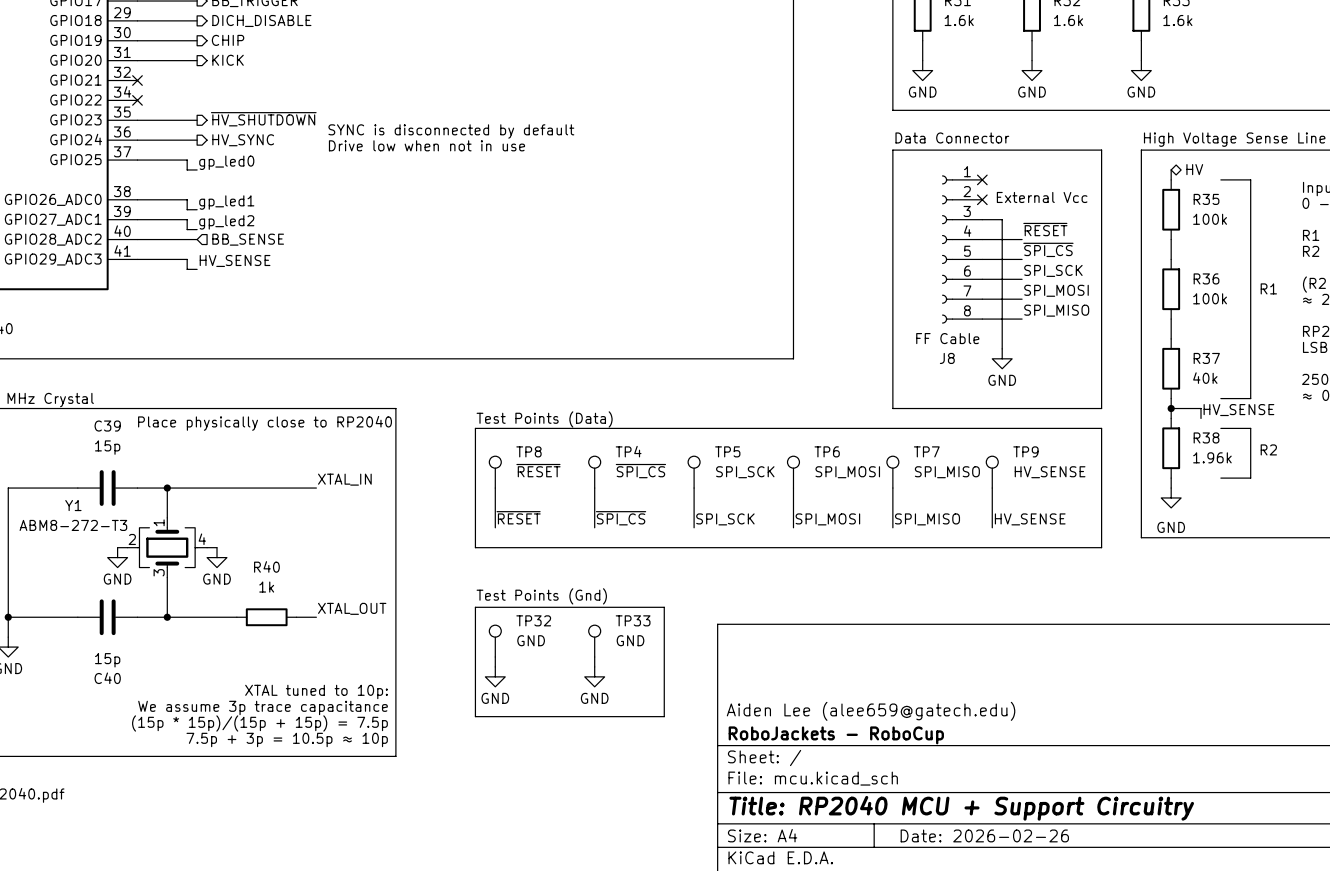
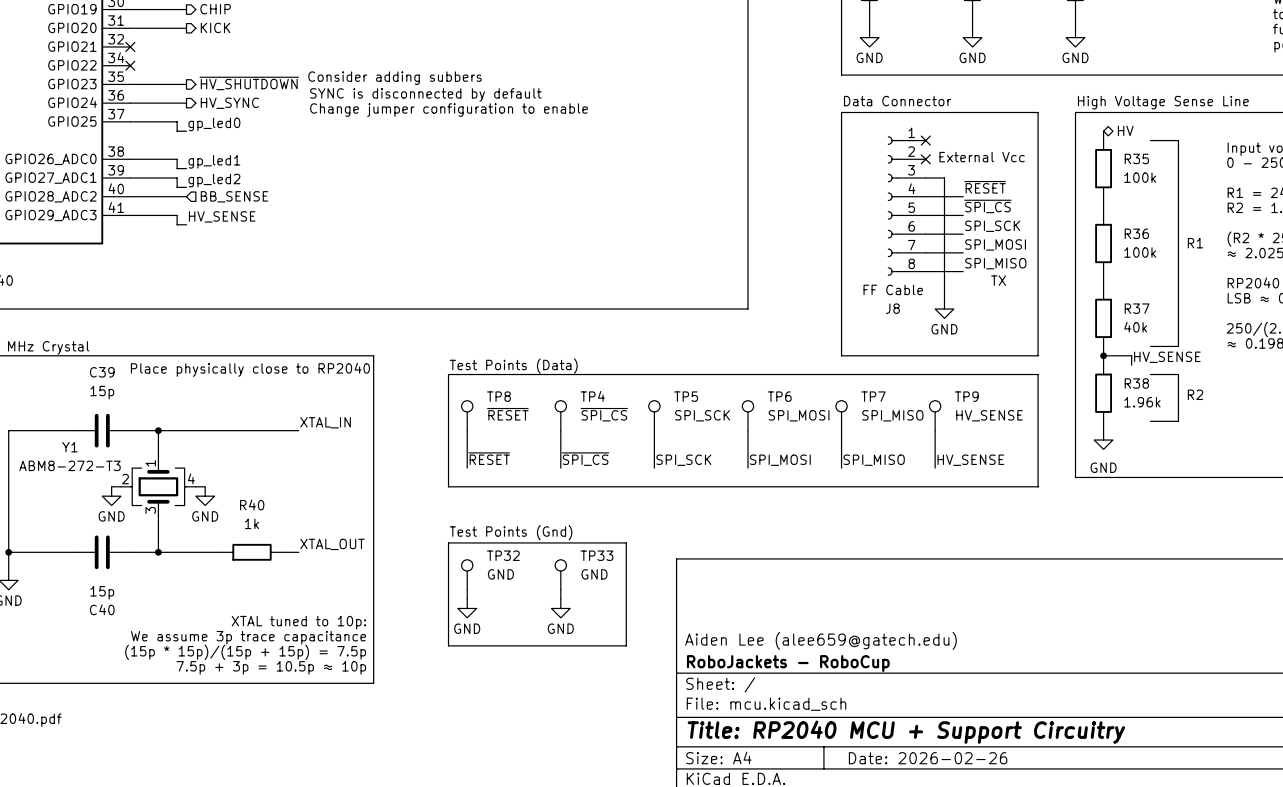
text: none -> Consider adding subbers (395, 78)
text: Drive low when not in use (426, 145) -> Change jumper configuration to enable (449, 110)
text: none -> TX (998, 280)

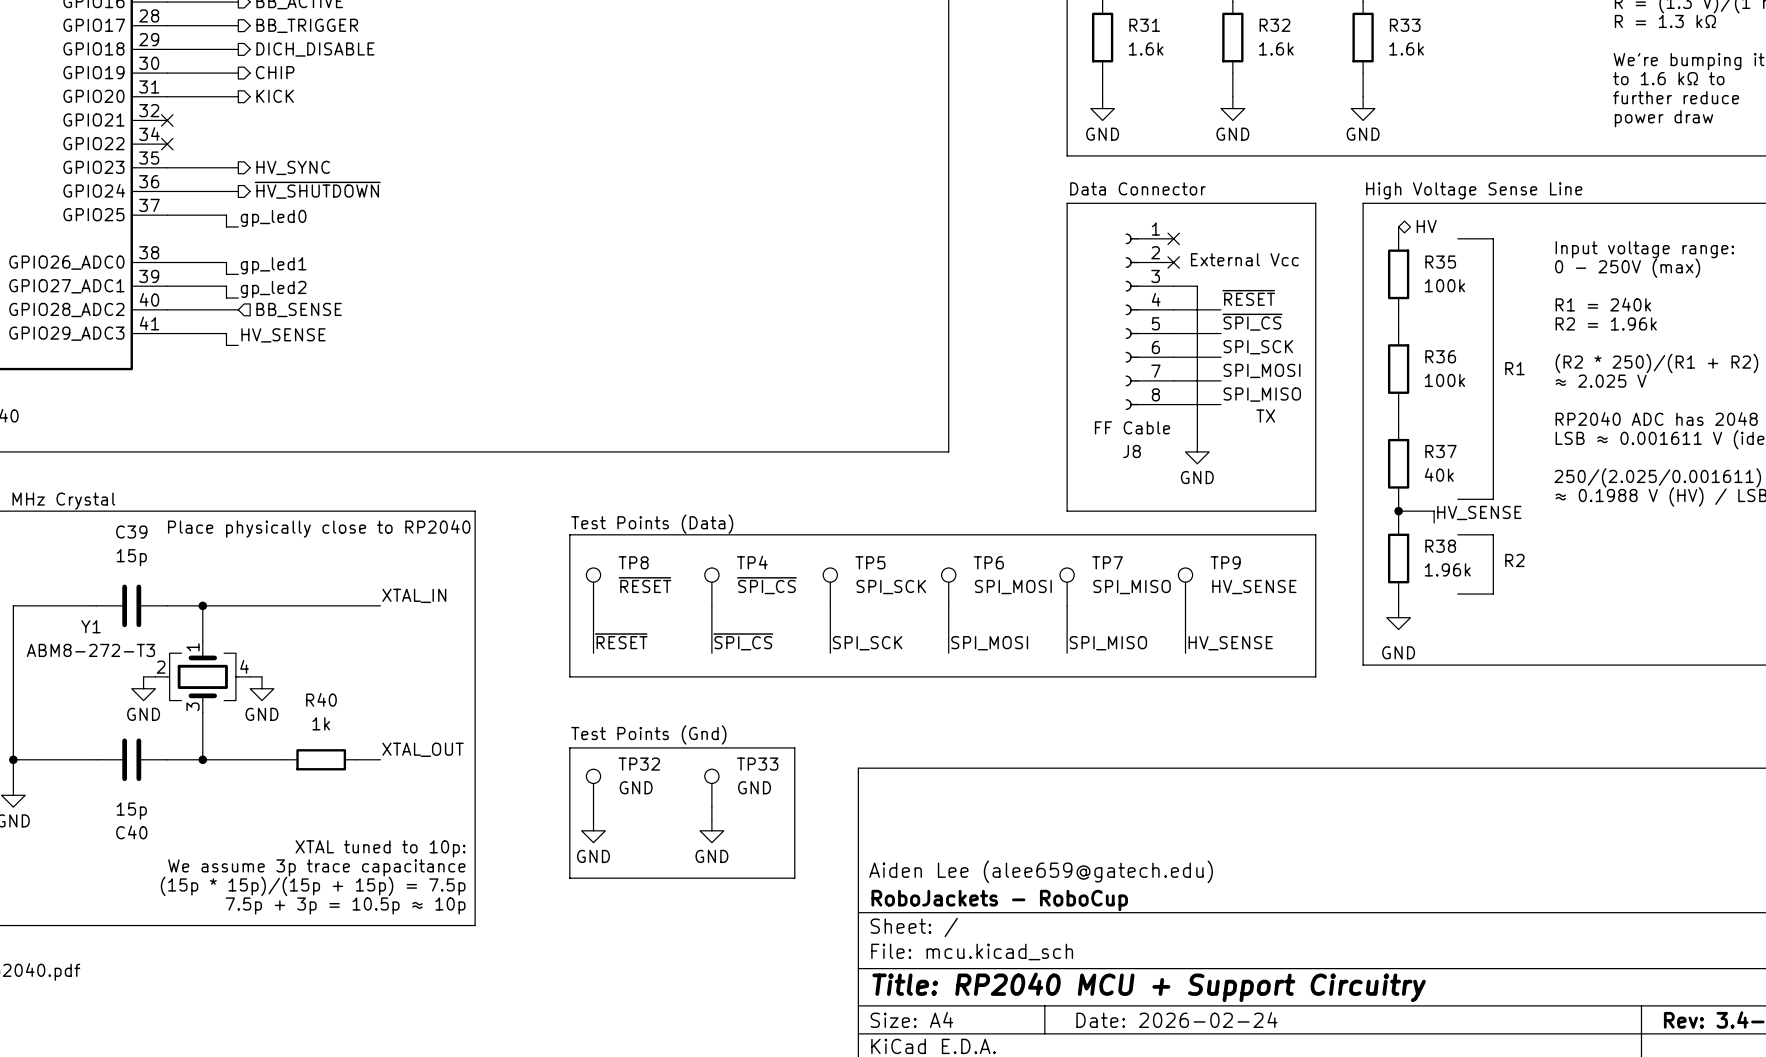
text: Consider adding subbers (395, 78) -> none
hierarchical label: ~{HV_SHUTDOWN} (249, 83) -> HV_SYNC (293, 167)
text: SYNC is disconnected by default (425, 94) -> none
hierarchical label: HV_SYNC (229, 103) -> ~{HV_SHUTDOWN} (317, 190)
text: Change jumper configuration to enable (449, 110) -> none
title block: Date: 2026-02-26 (928, 758) -> Date: 2026-02-24 (1176, 1019)

